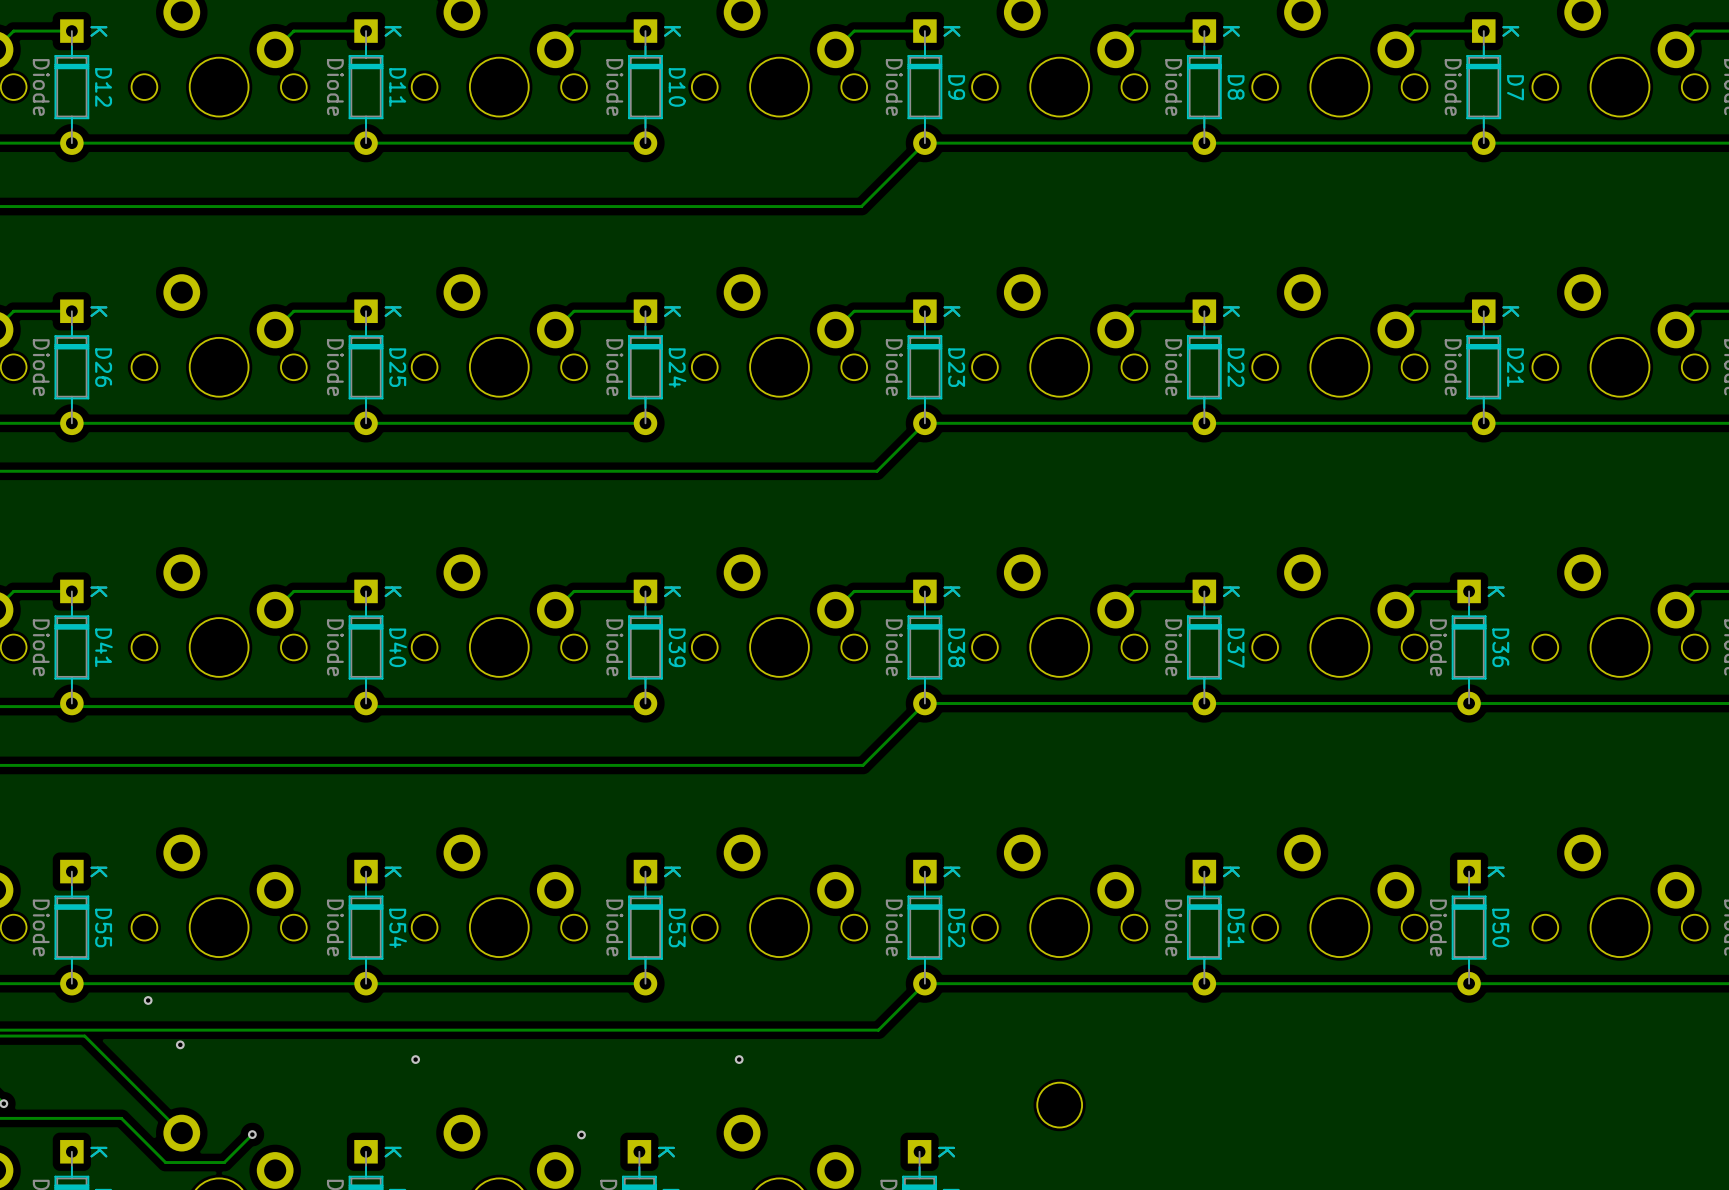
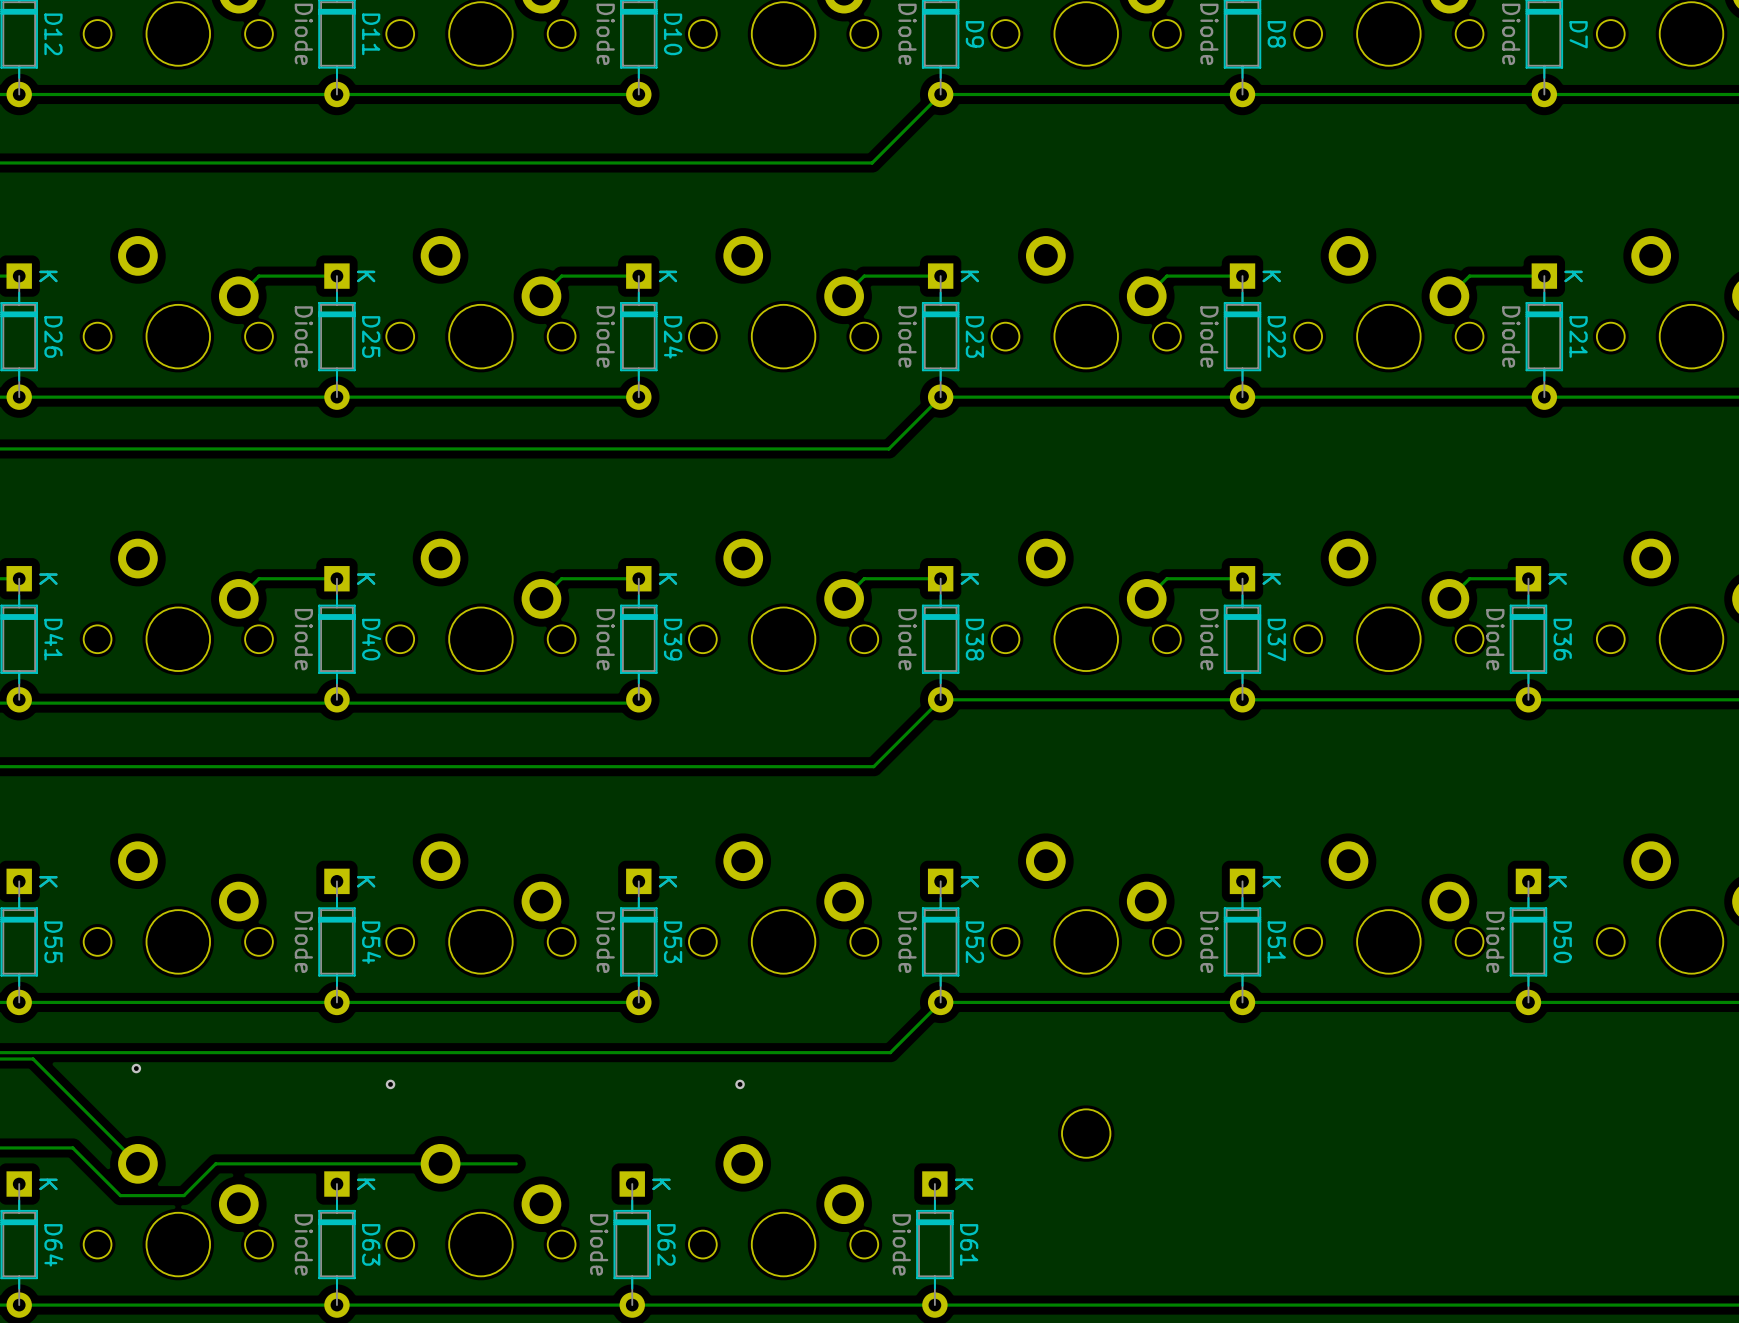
via: (148, 1000) -> none
track: none -> (516, 1163) (215, 1163)
via: (252, 1134) -> none
via: (581, 1134) -> none

